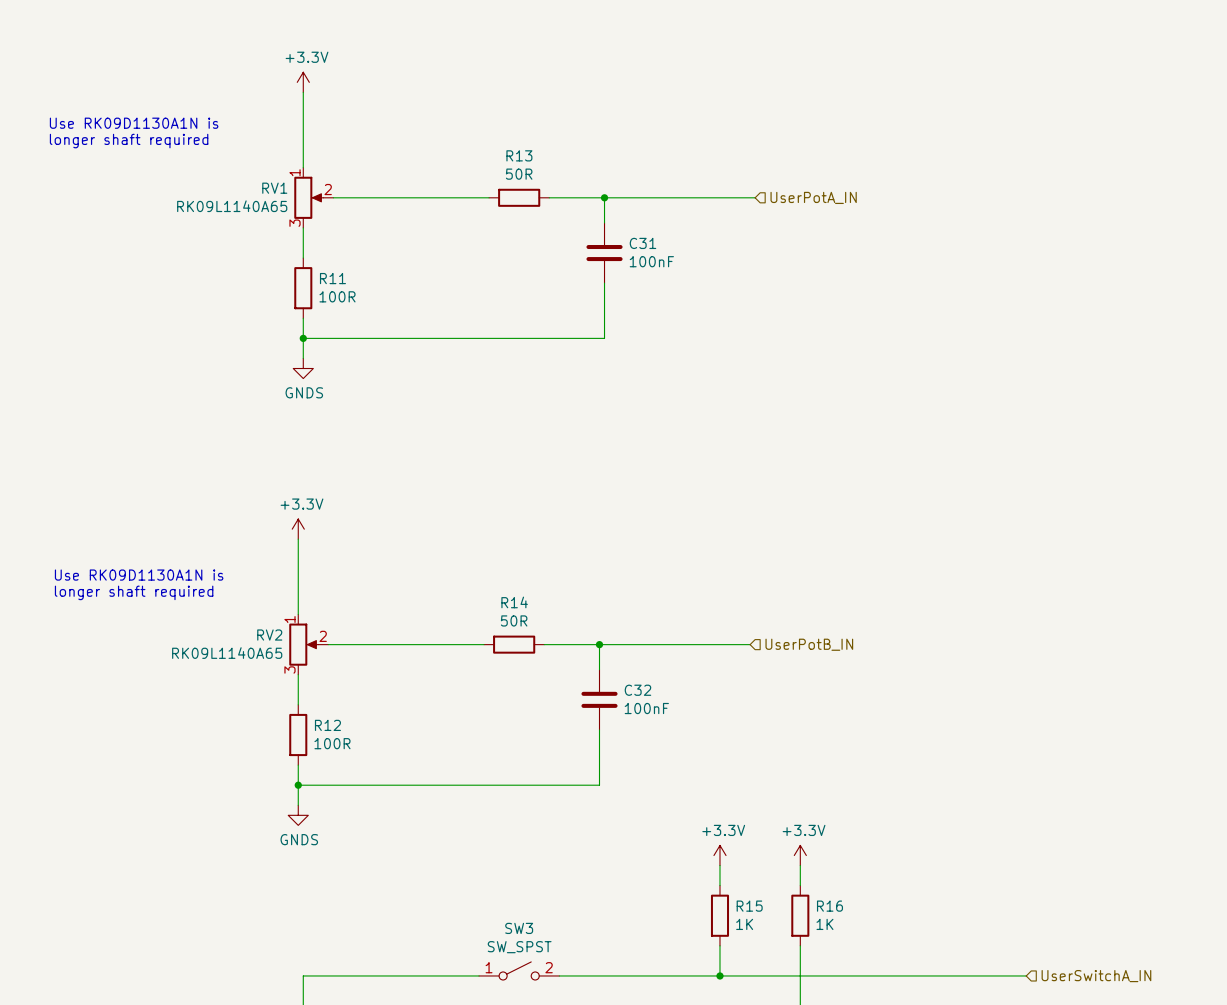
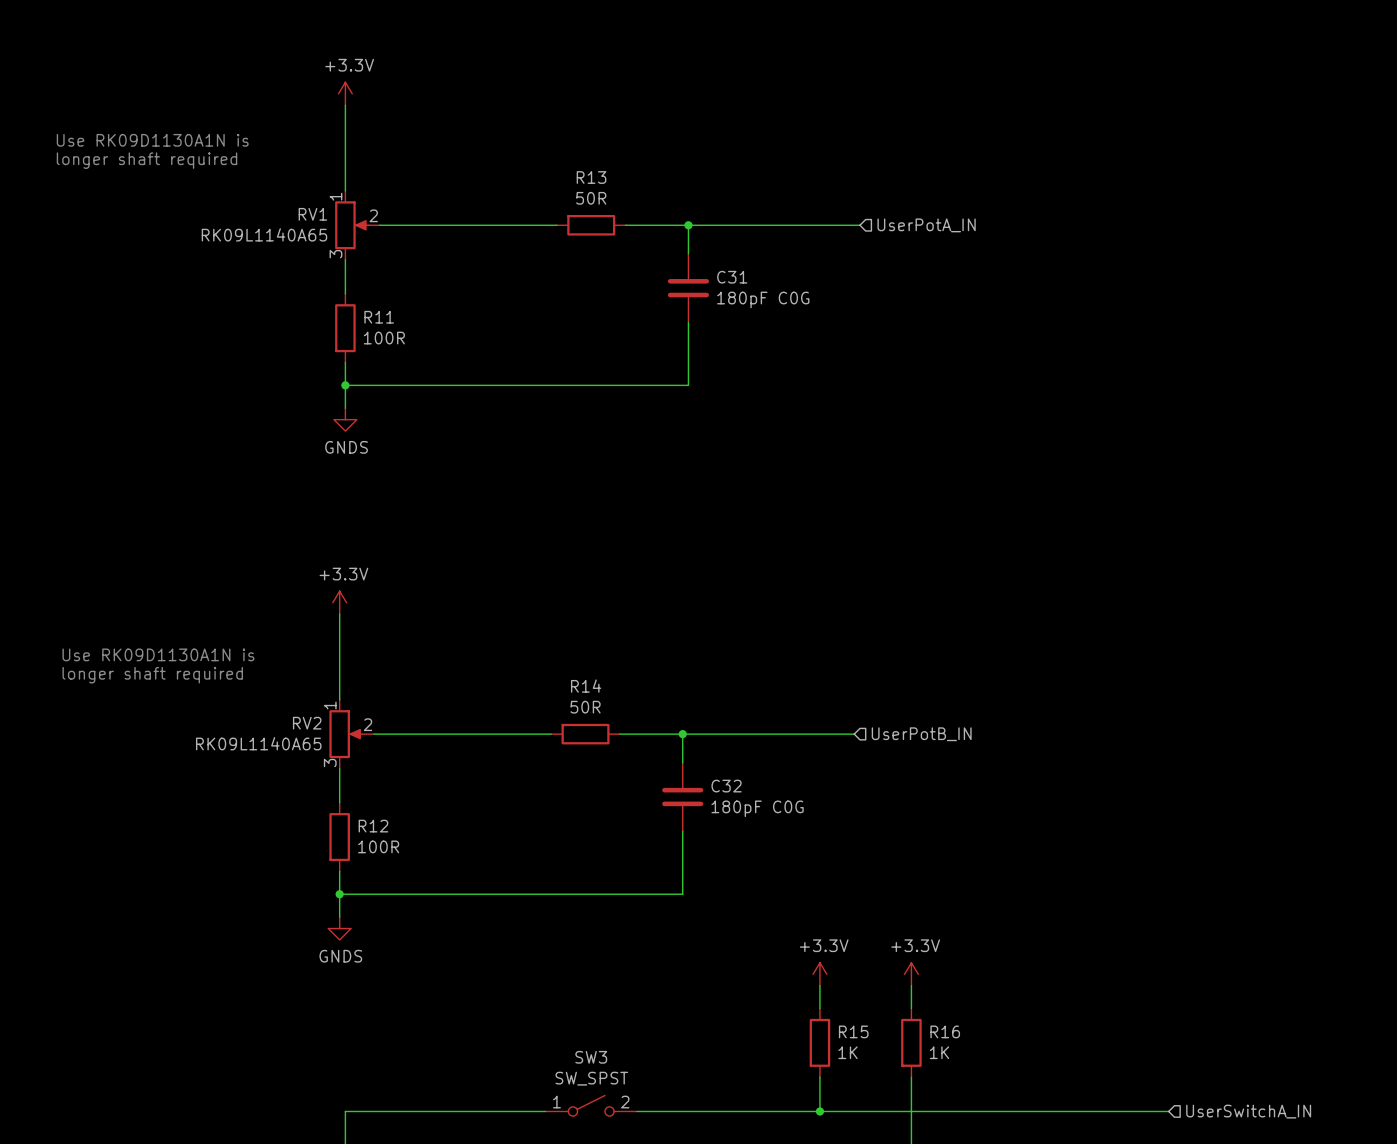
C31 value: 100nF (651, 261) -> 180pF C0G (763, 299)
C32 value: 100nF (646, 708) -> 180pF C0G (757, 808)

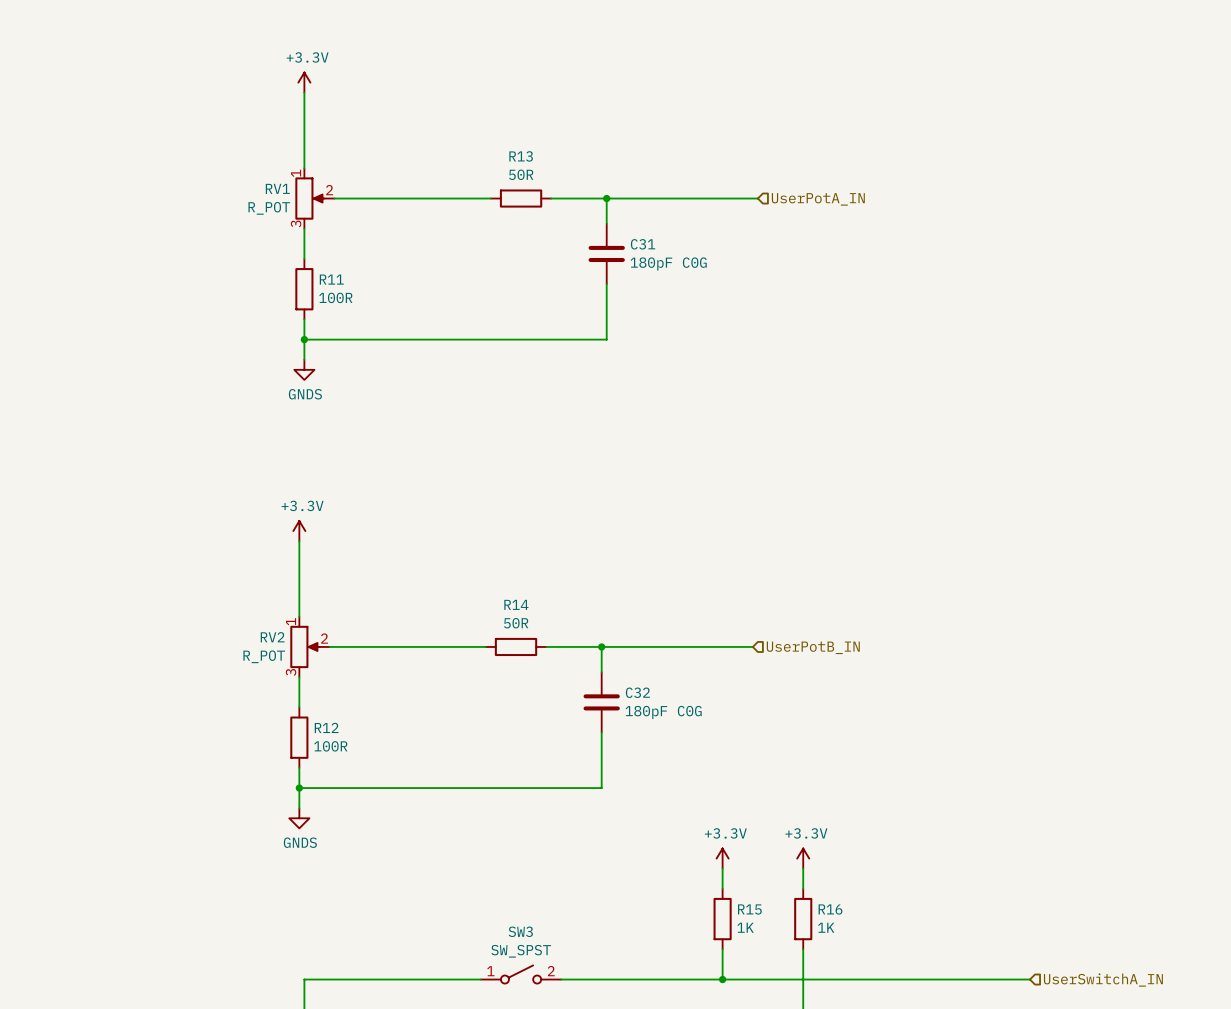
text: Use RK09D1130A1N is (152, 140) -> none
text: longer shaft required (147, 160) -> none
RV1 value: RK09L1140A65 (264, 234) -> R_POT (269, 208)
text: Use RK09D1130A1N is (158, 654) -> none
text: longer shaft required (152, 675) -> none
RV2 value: RK09L1140A65 (258, 743) -> R_POT (264, 656)

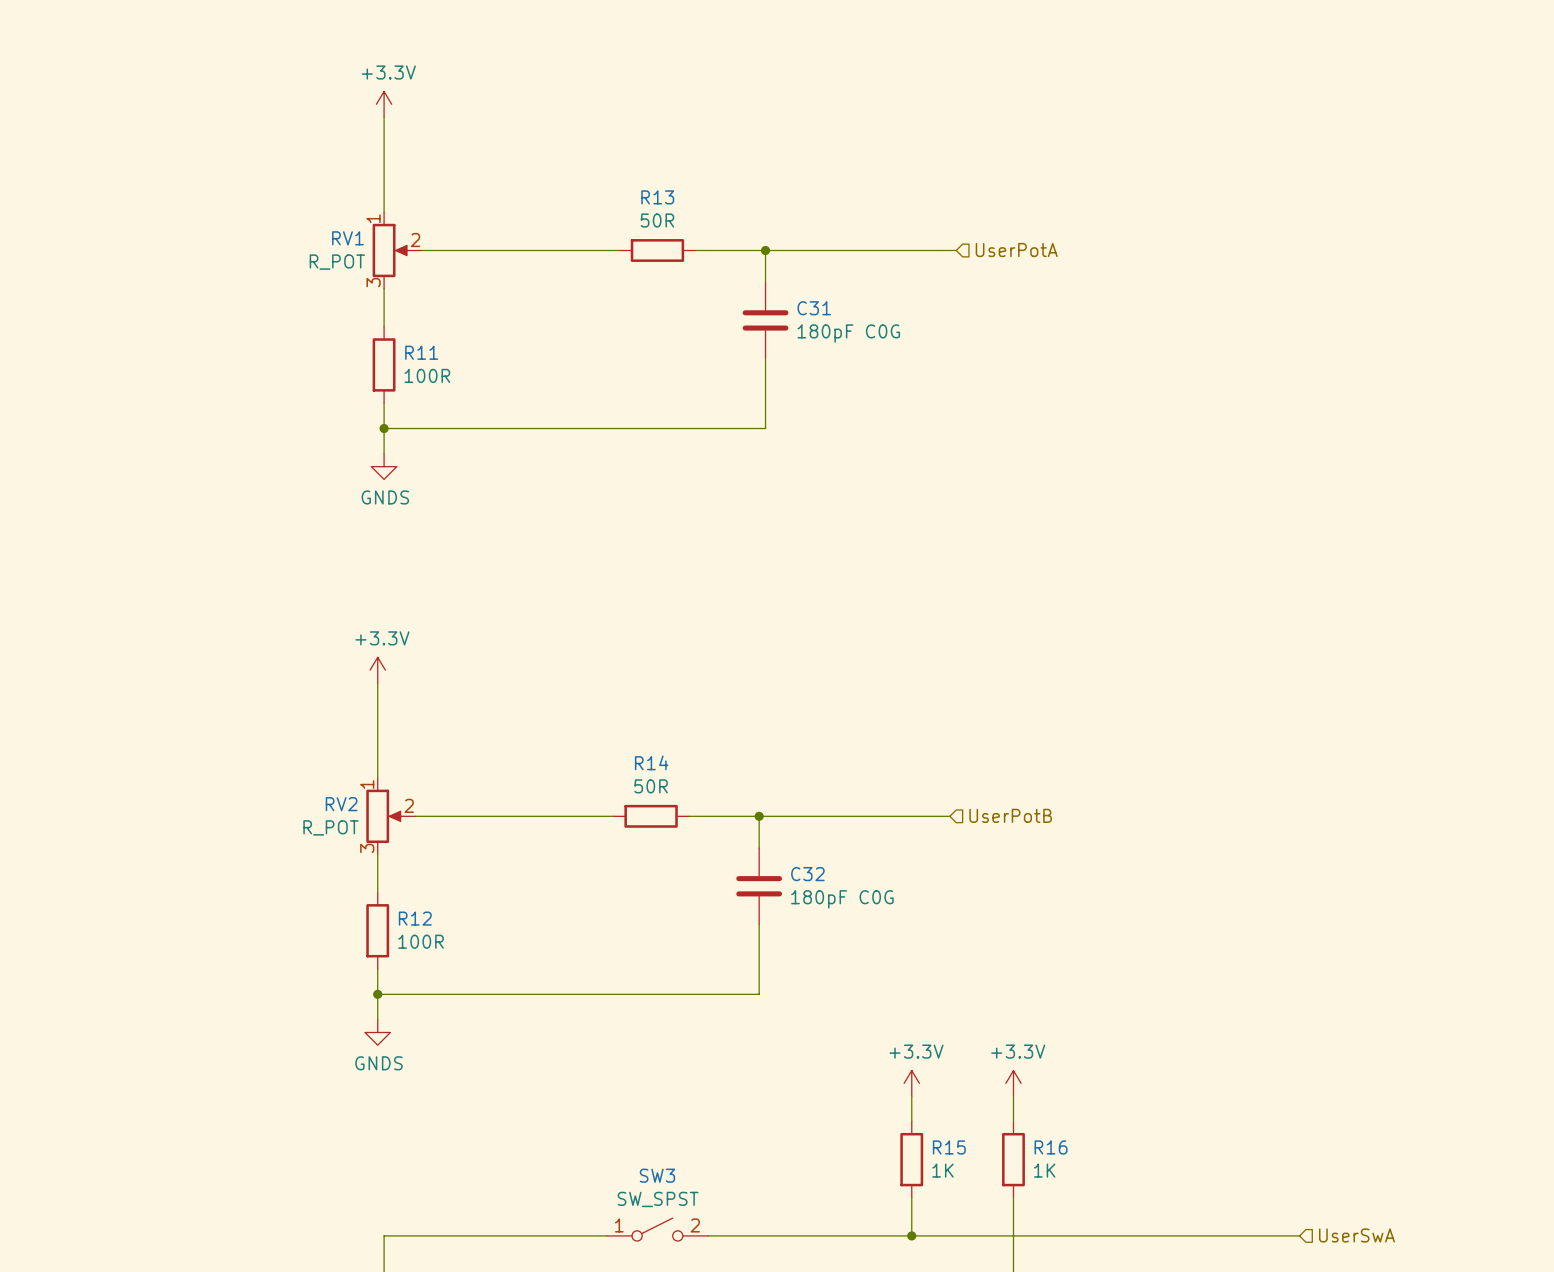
hierarchical label: UserPotA_IN (818, 199) -> UserPotA (1016, 250)
hierarchical label: UserPotB_IN (813, 647) -> UserPotB (1010, 815)
hierarchical label: UserSwitchA_IN (1103, 980) -> UserSwA (1356, 1235)

